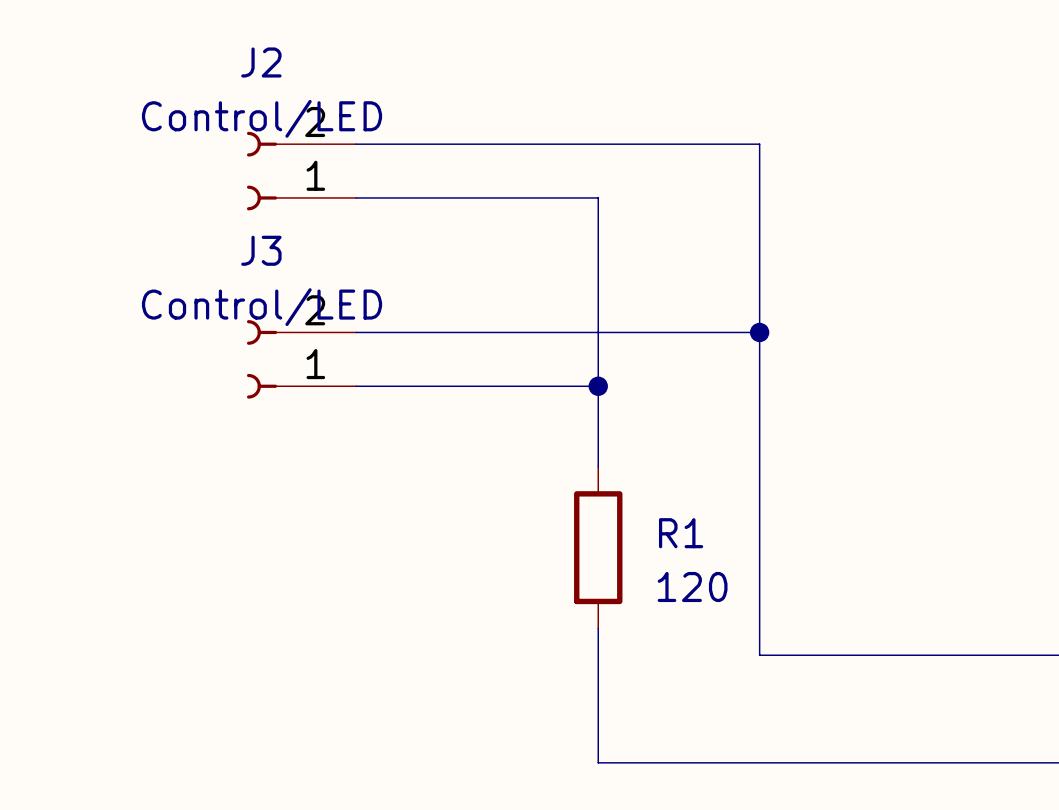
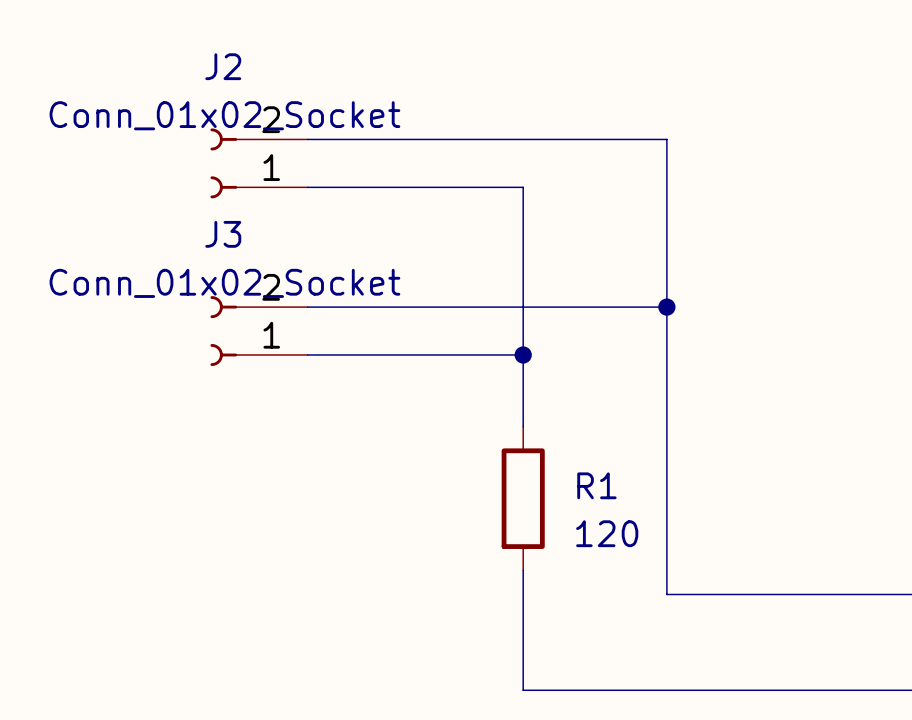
J2 value: Control/LED (262, 118) -> Conn_01x02_Socket (224, 115)
J3 value: Control/LED (262, 307) -> Conn_01x02_Socket (224, 283)

